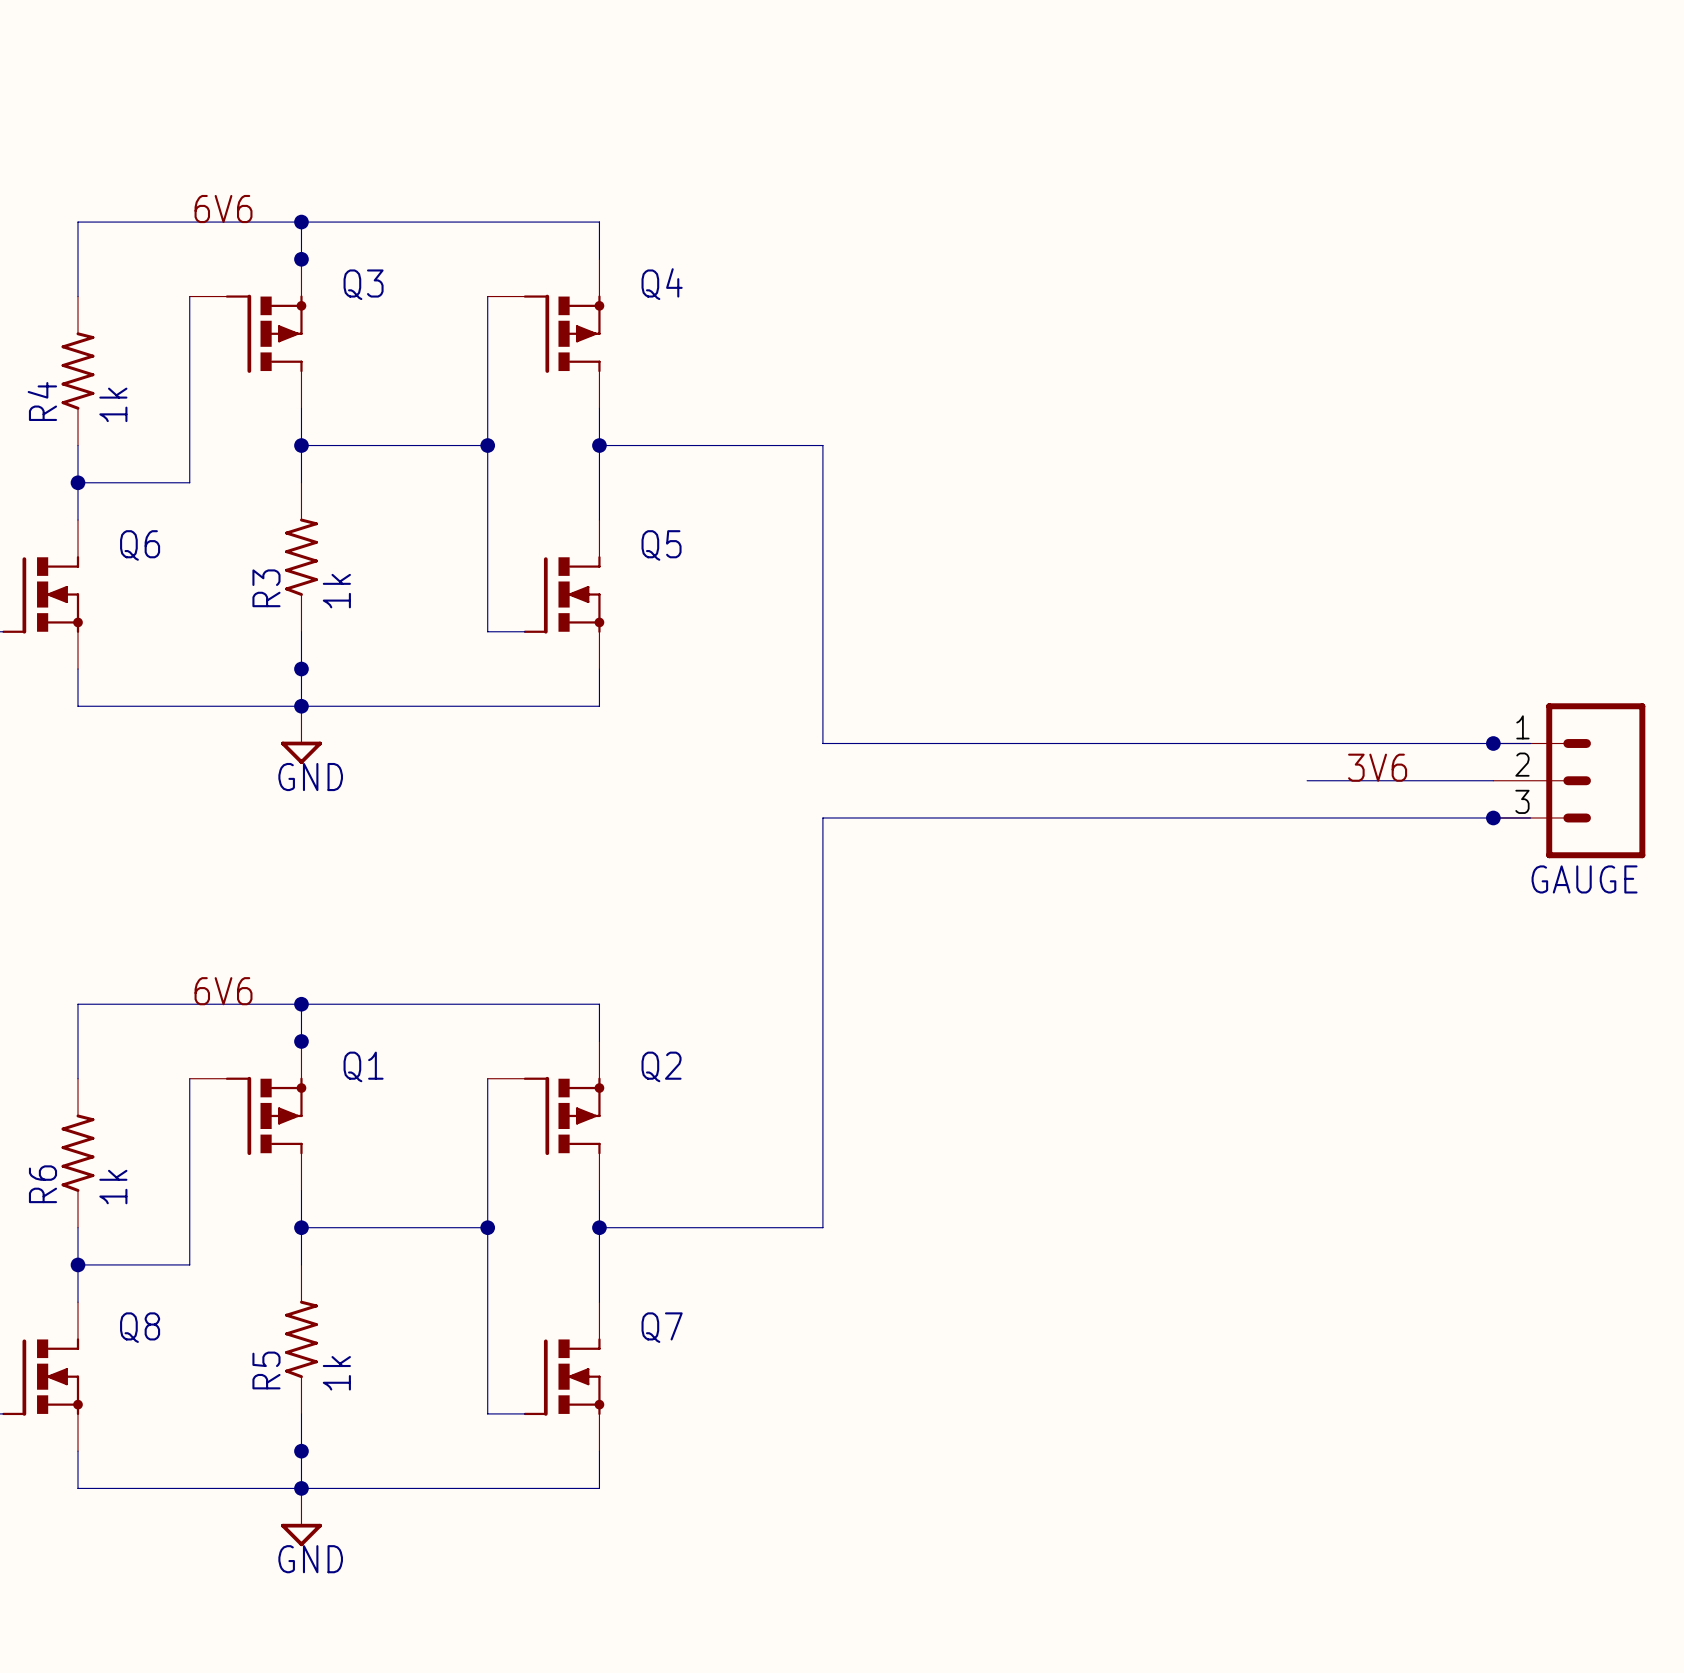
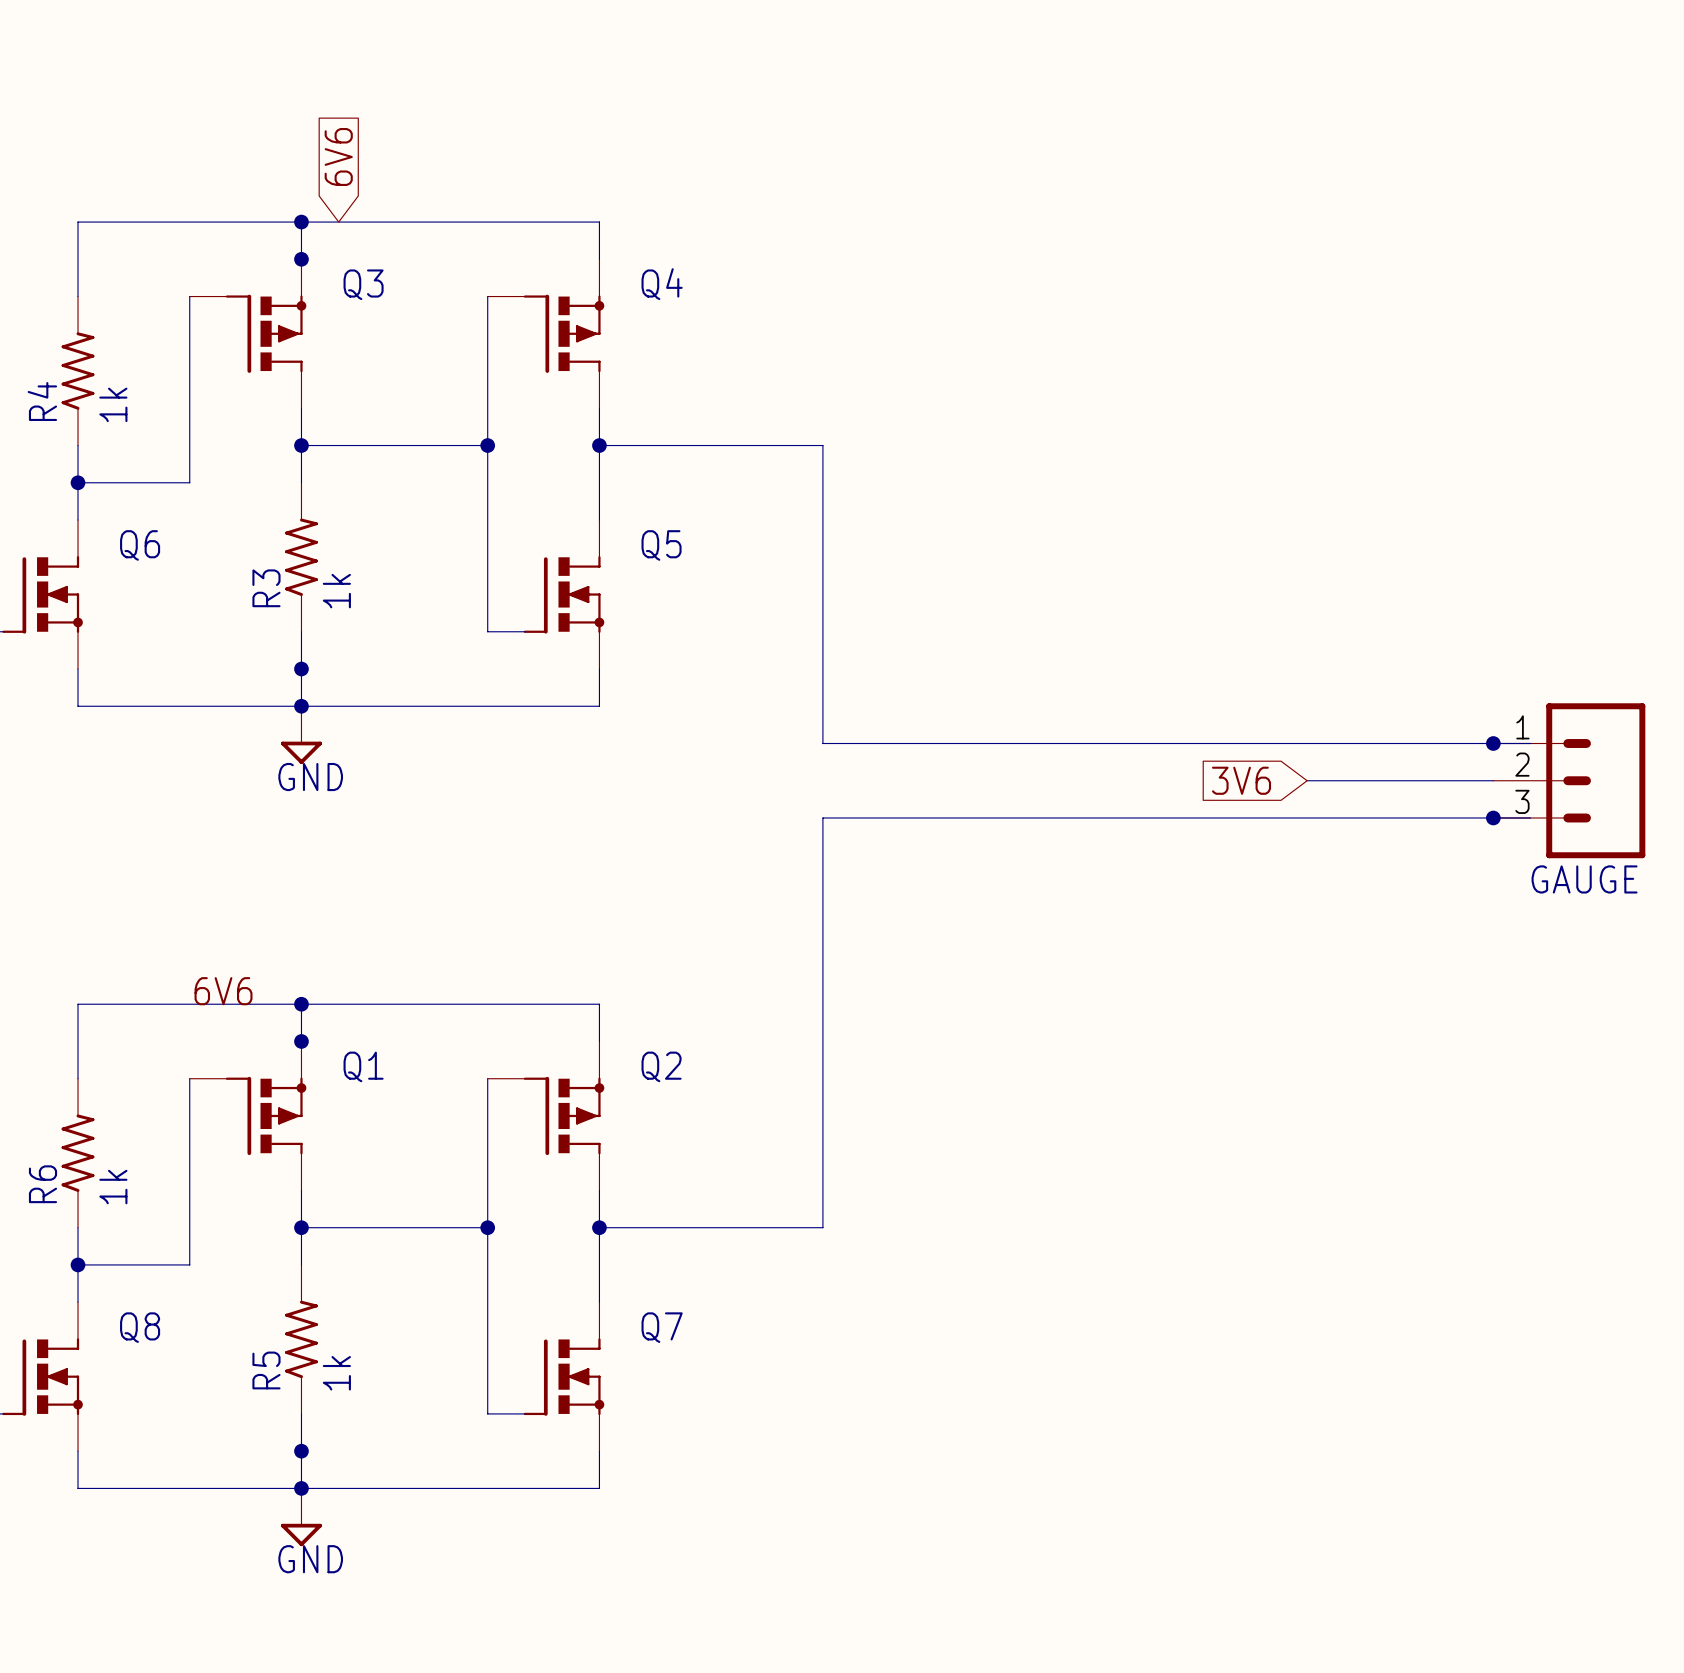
global label: none -> 6V6 (338, 156)
label: 6V6 (223, 209) -> none
label: 3V6 (1377, 767) -> none
global label: none -> 3V6 (1241, 780)

